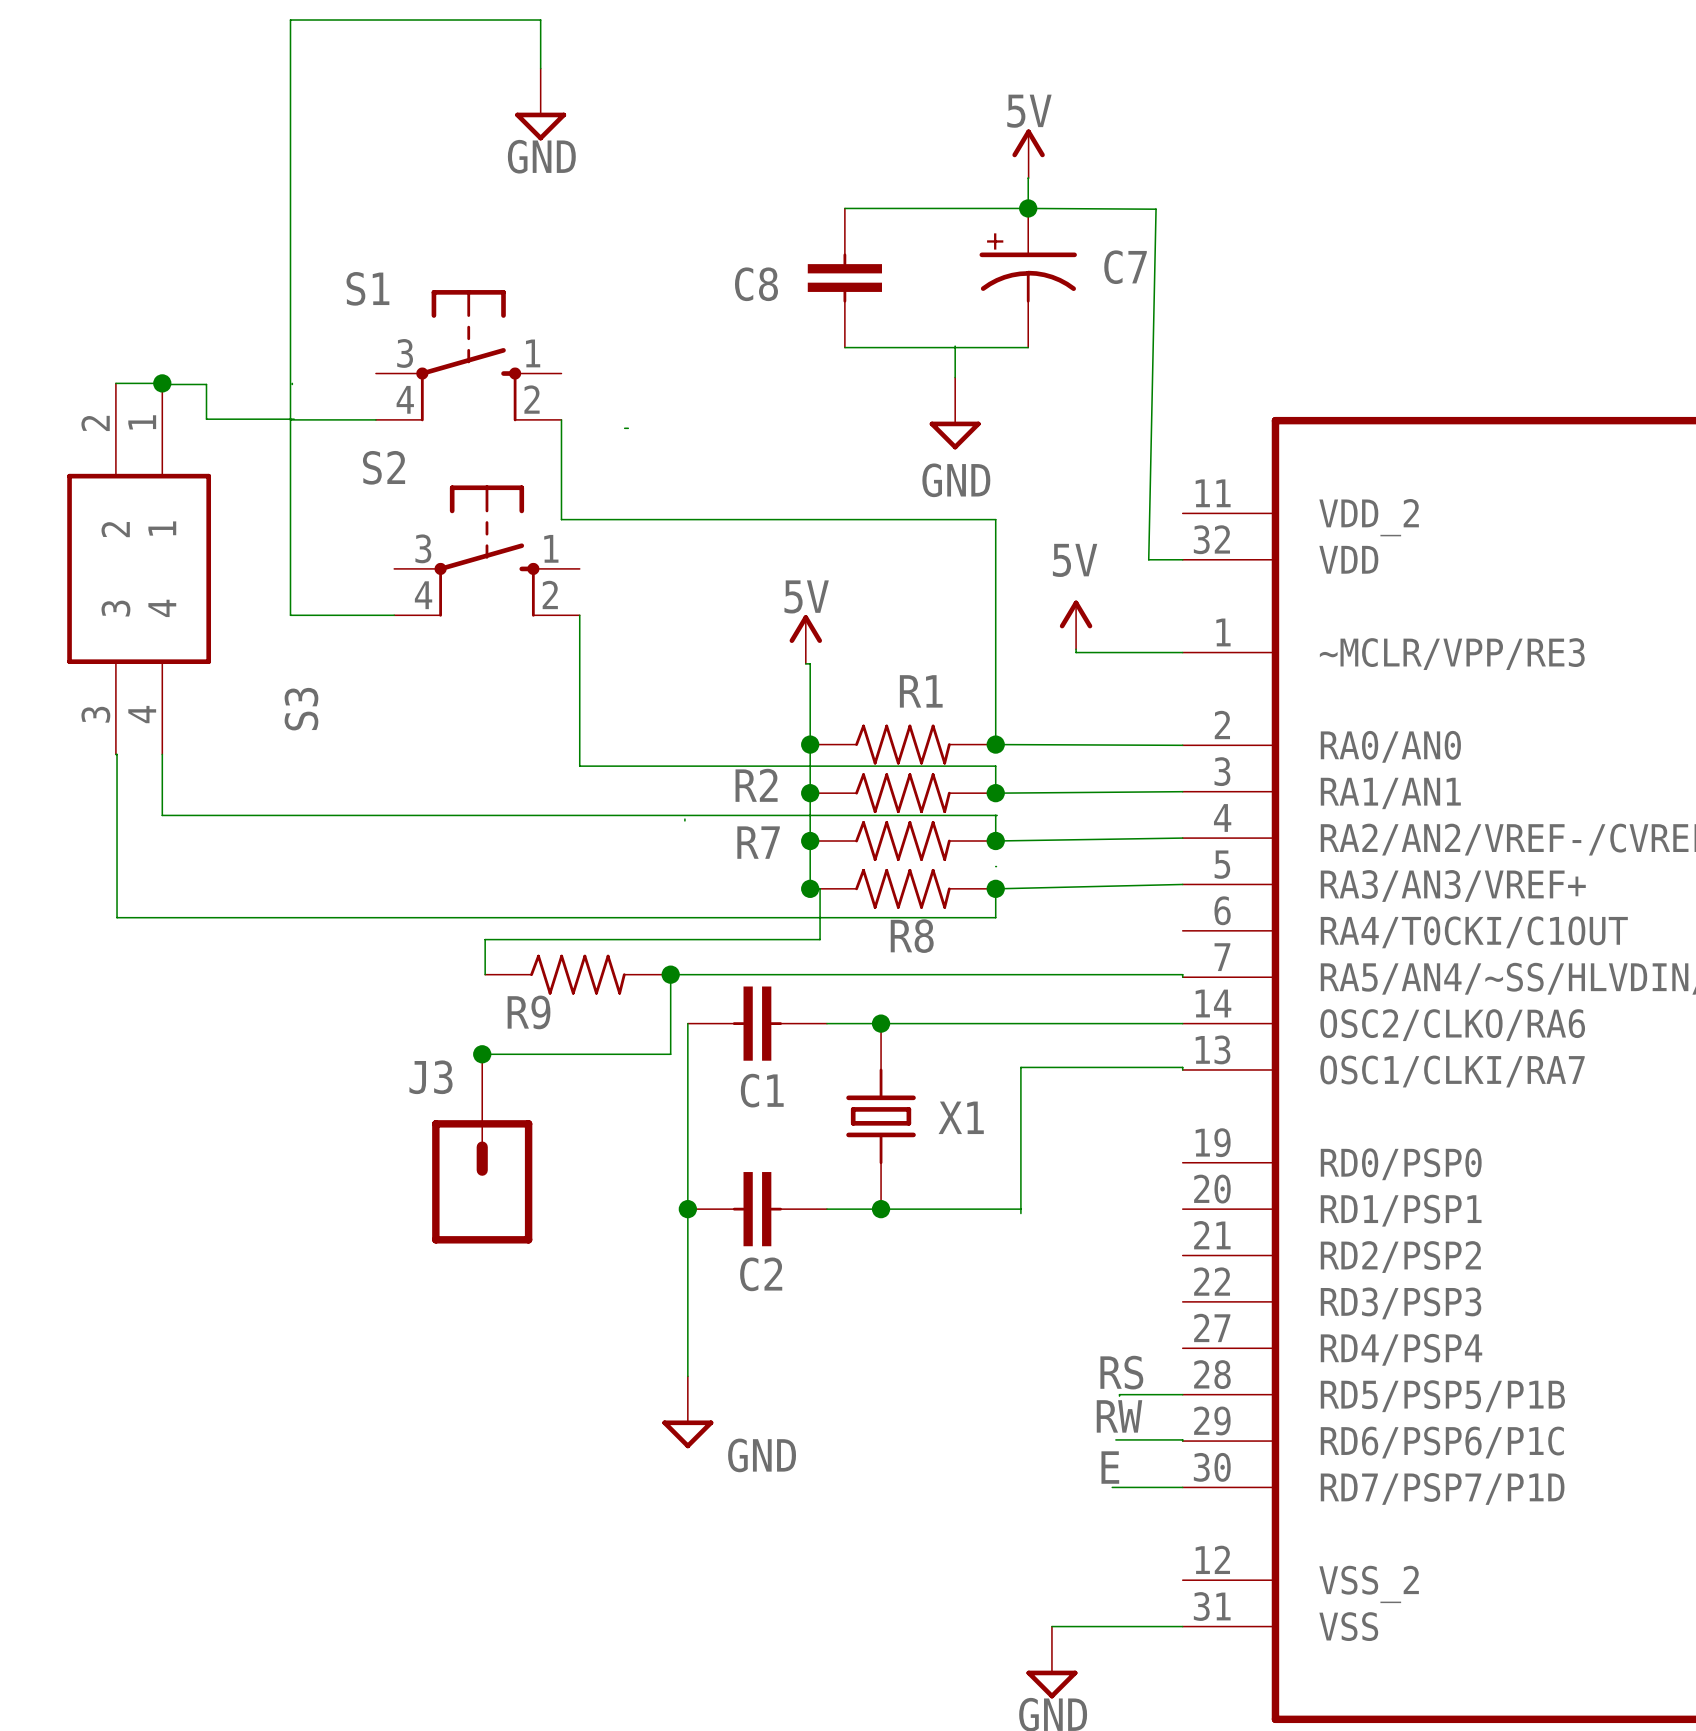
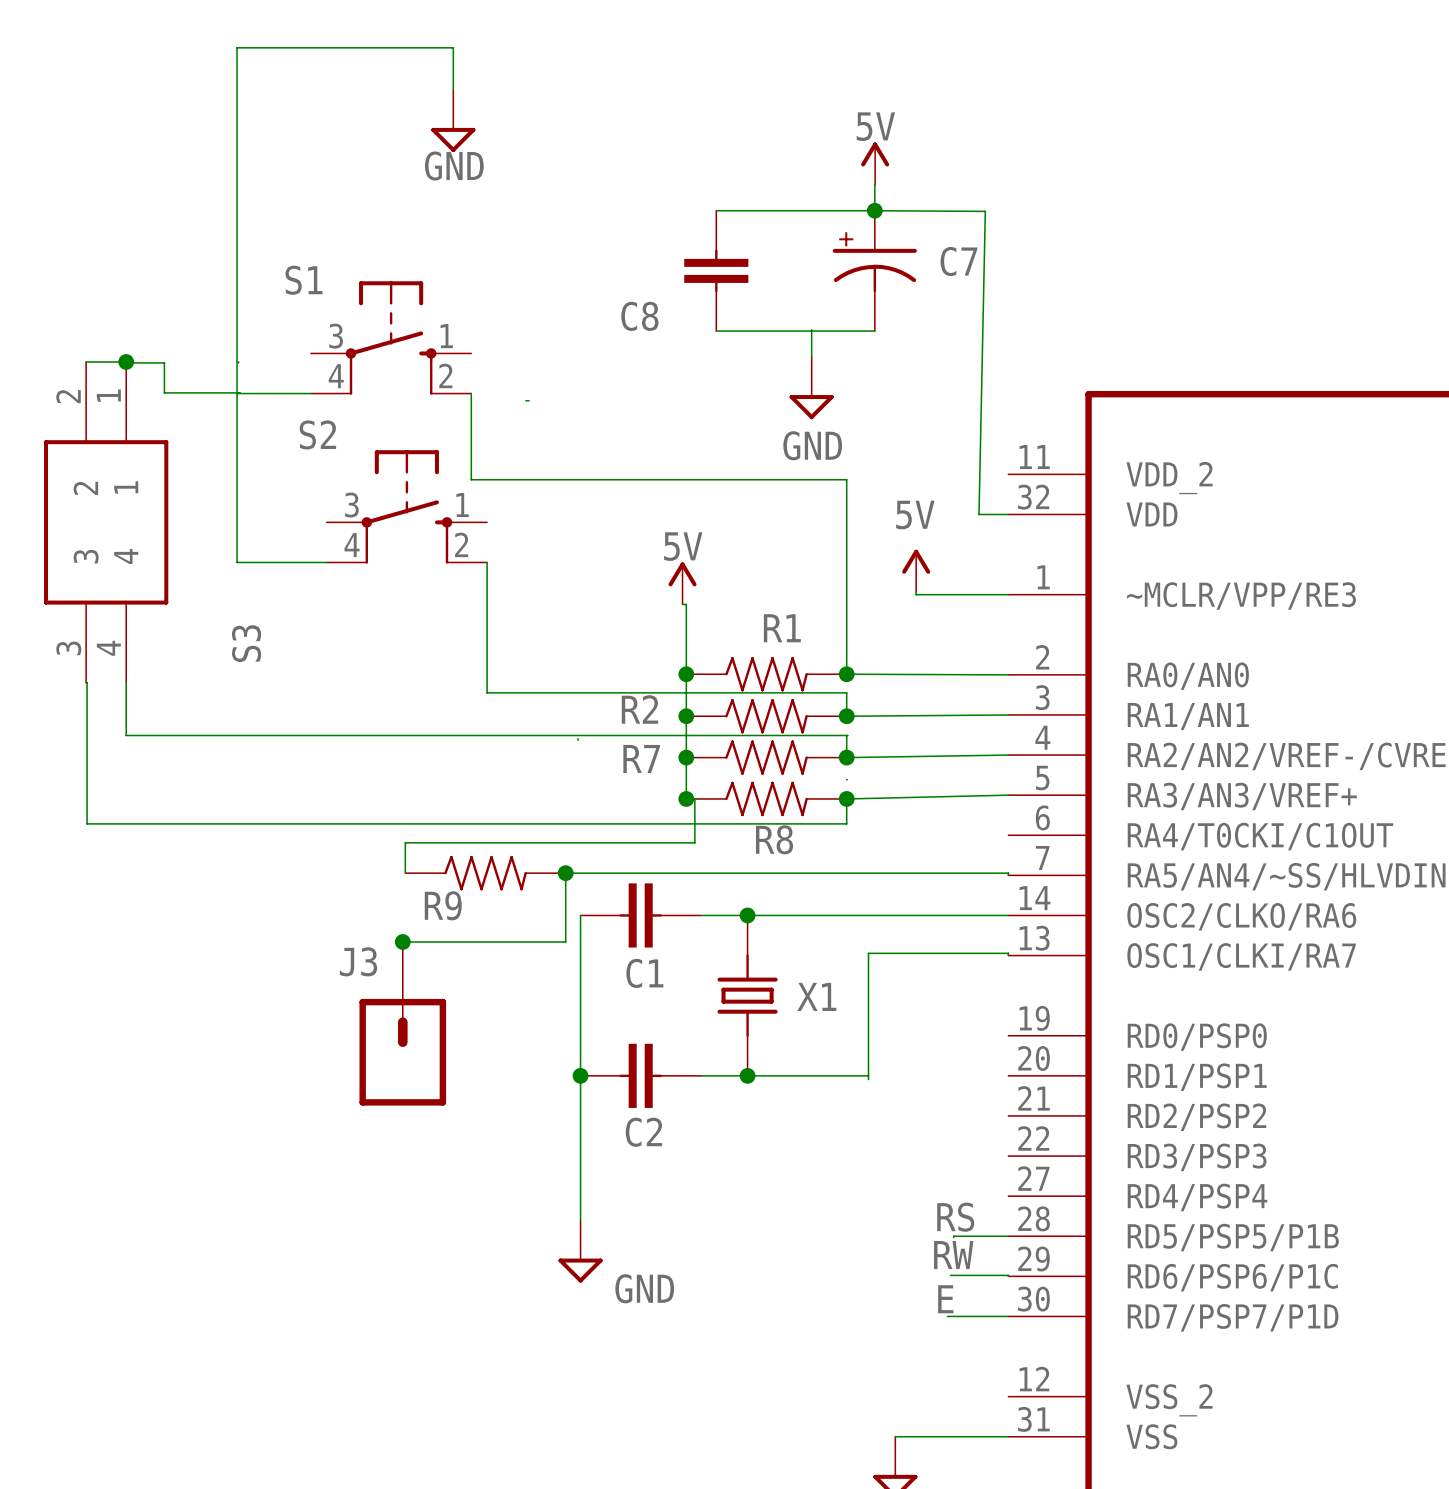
C8 name position: C8 (756, 284) -> C8 (639, 316)

